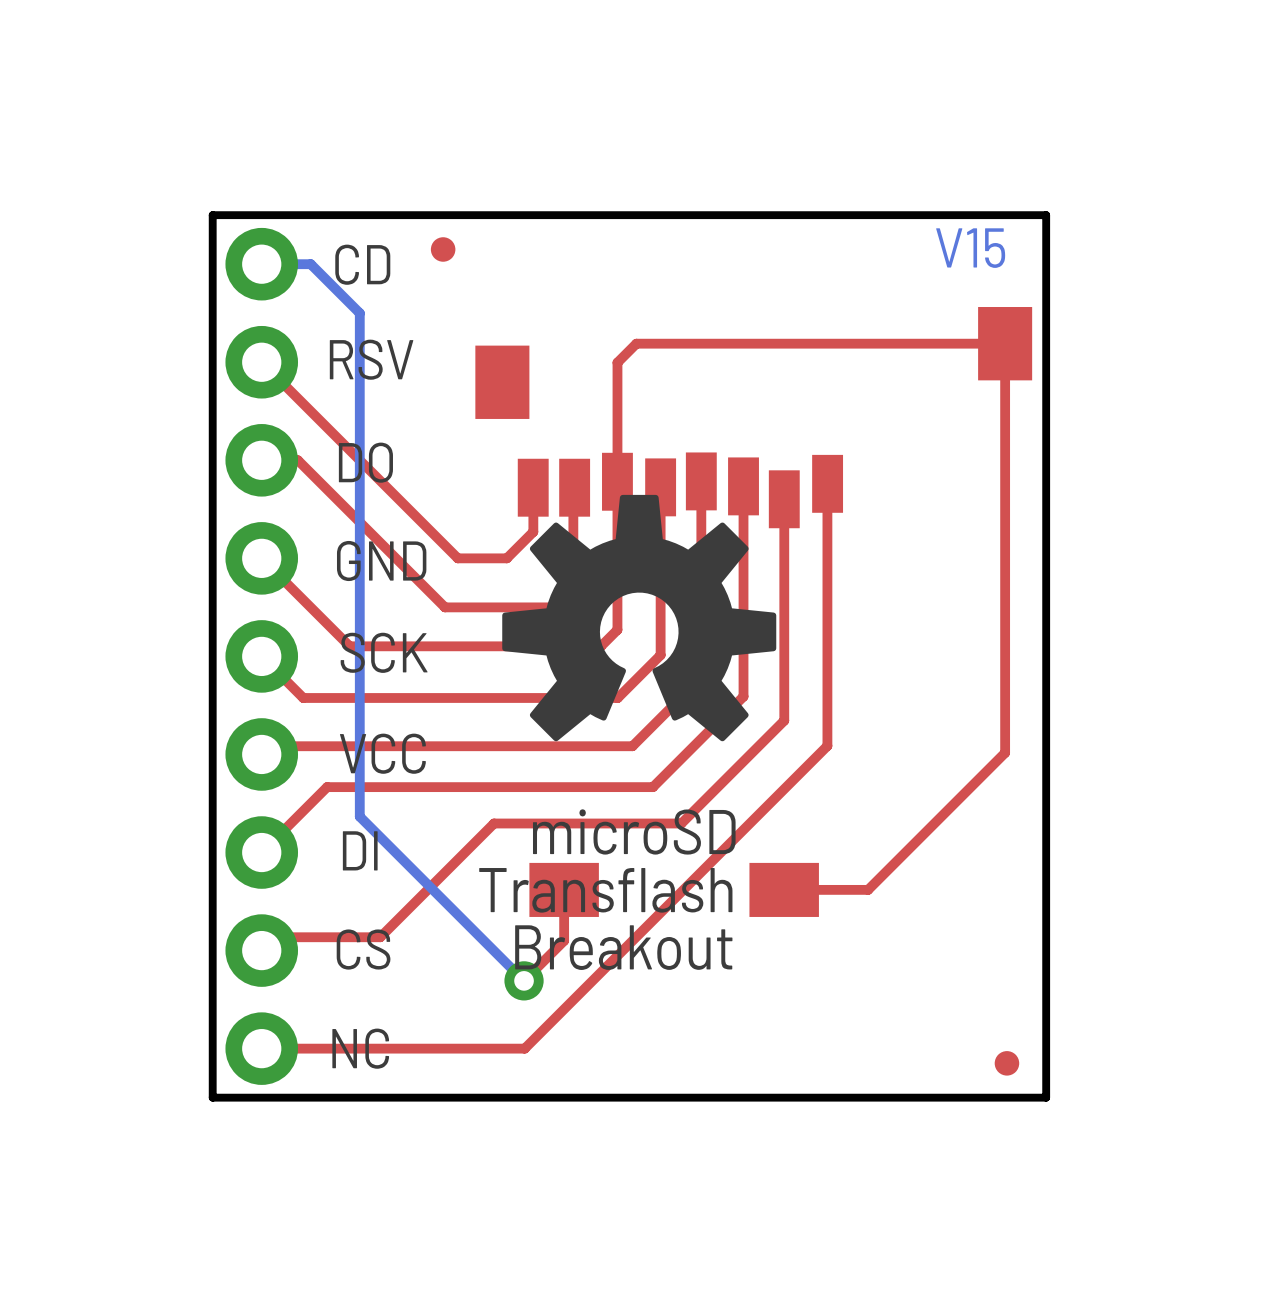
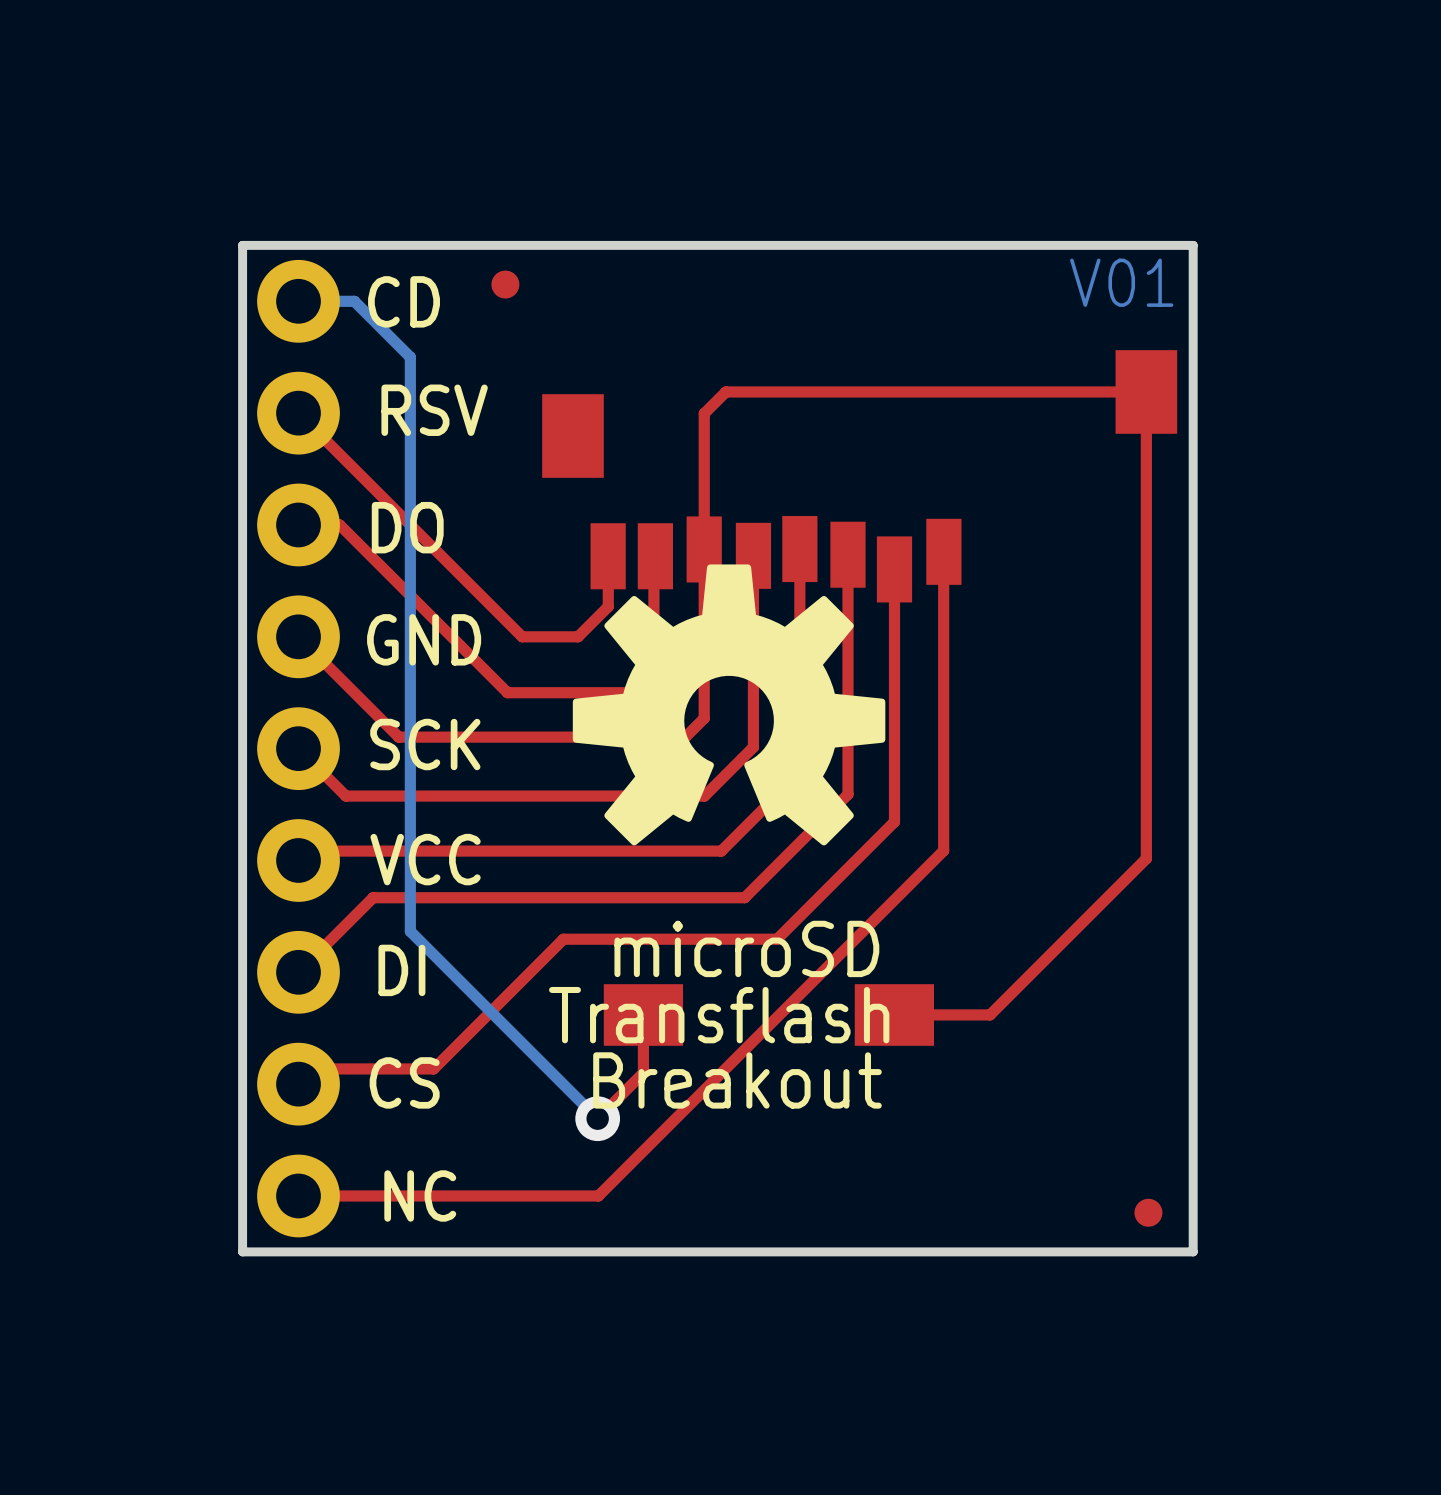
text: V15 (970, 248) -> V01 (1121, 282)

